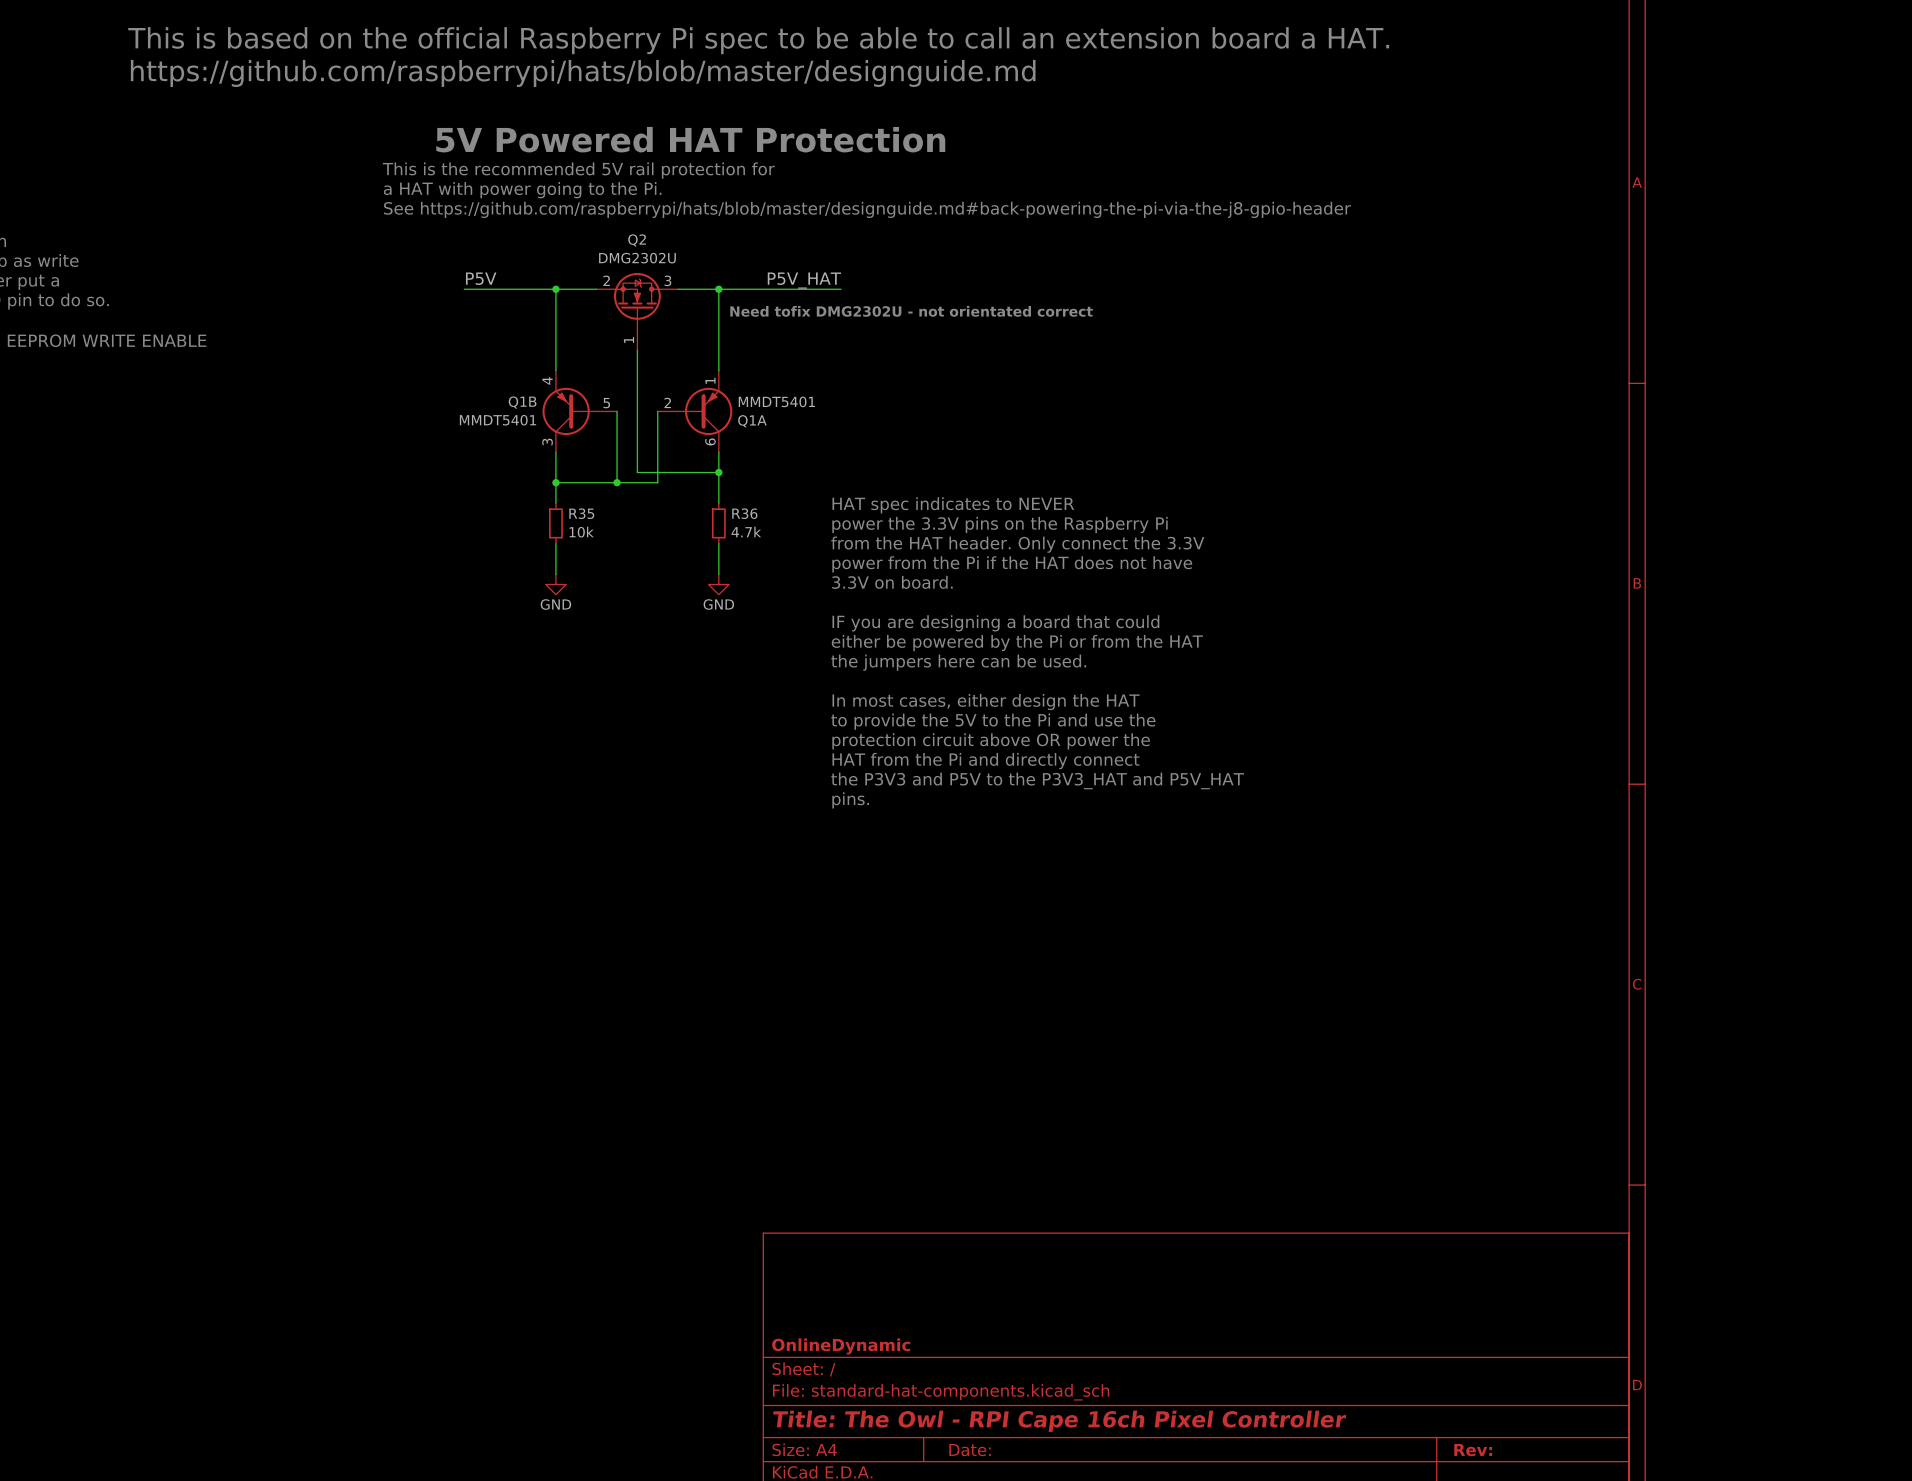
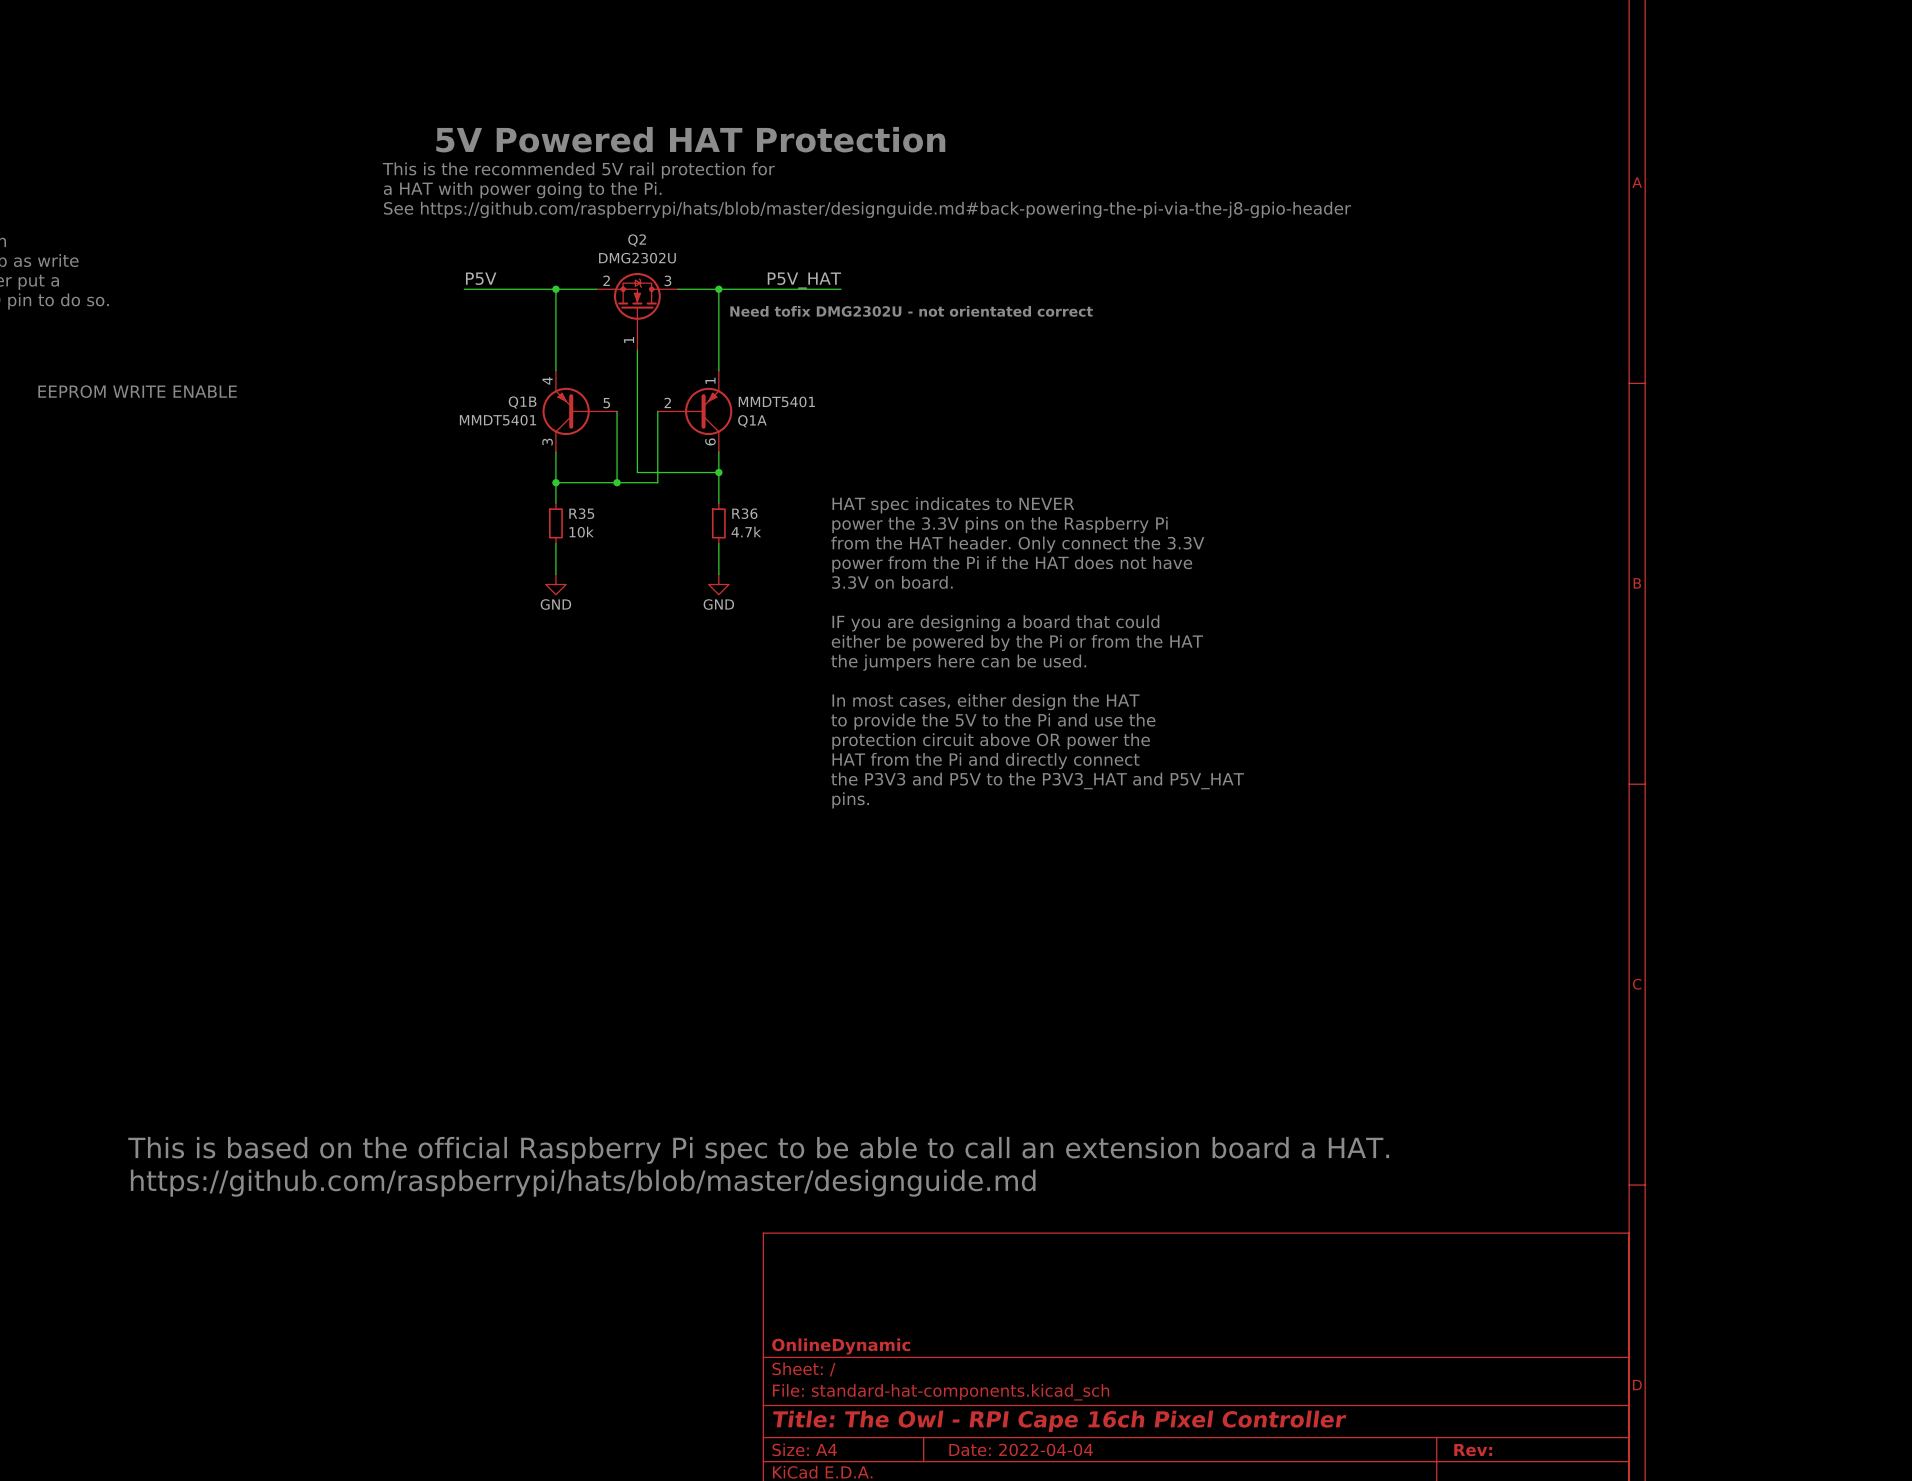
text: This is based on the official Raspberry Pi spec to be able to call an extension board a HAT. (758, 40) -> none
text: https://github.com/raspberrypi/hats/blob/master/designguide.md (583, 73) -> none
text position: EEPROM WRITE ENABLE (107, 340) -> EEPROM WRITE ENABLE (137, 391)
text: none -> This is based on the official Raspberry Pi spec to be able to call an extension board a HAT. (758, 1150)
text: none -> https://github.com/raspberrypi/hats/blob/master/designguide.md (583, 1183)
title block: Date: (970, 1450) -> Date: 2022-04-04 (1021, 1449)

